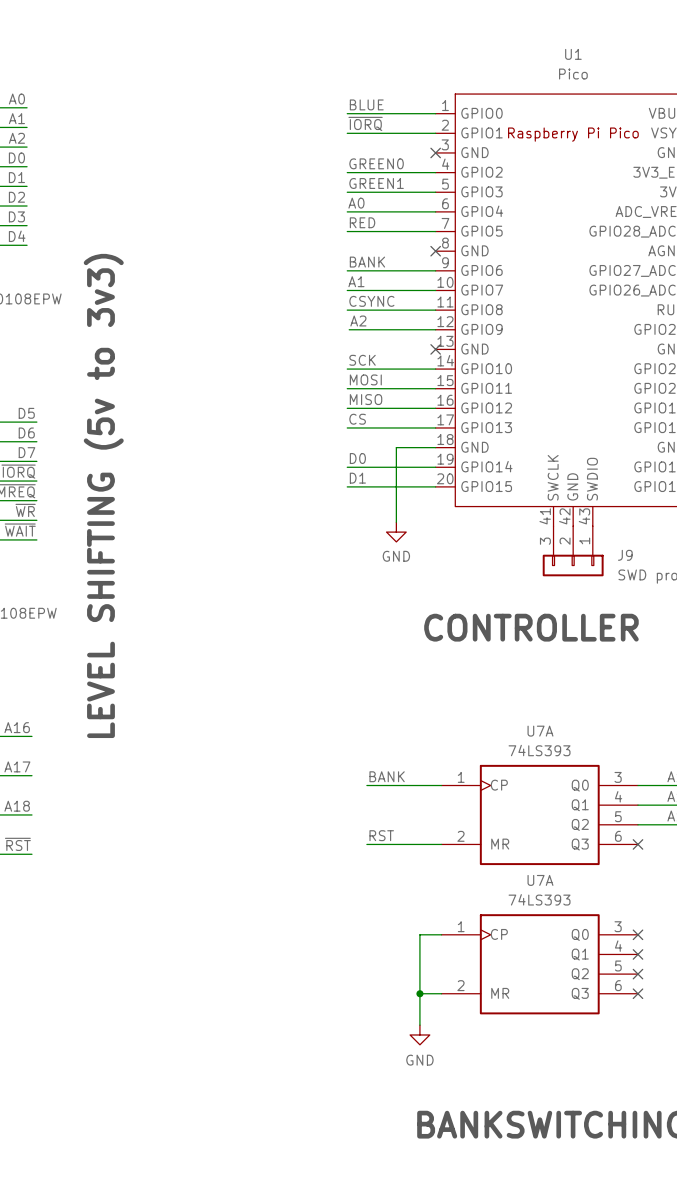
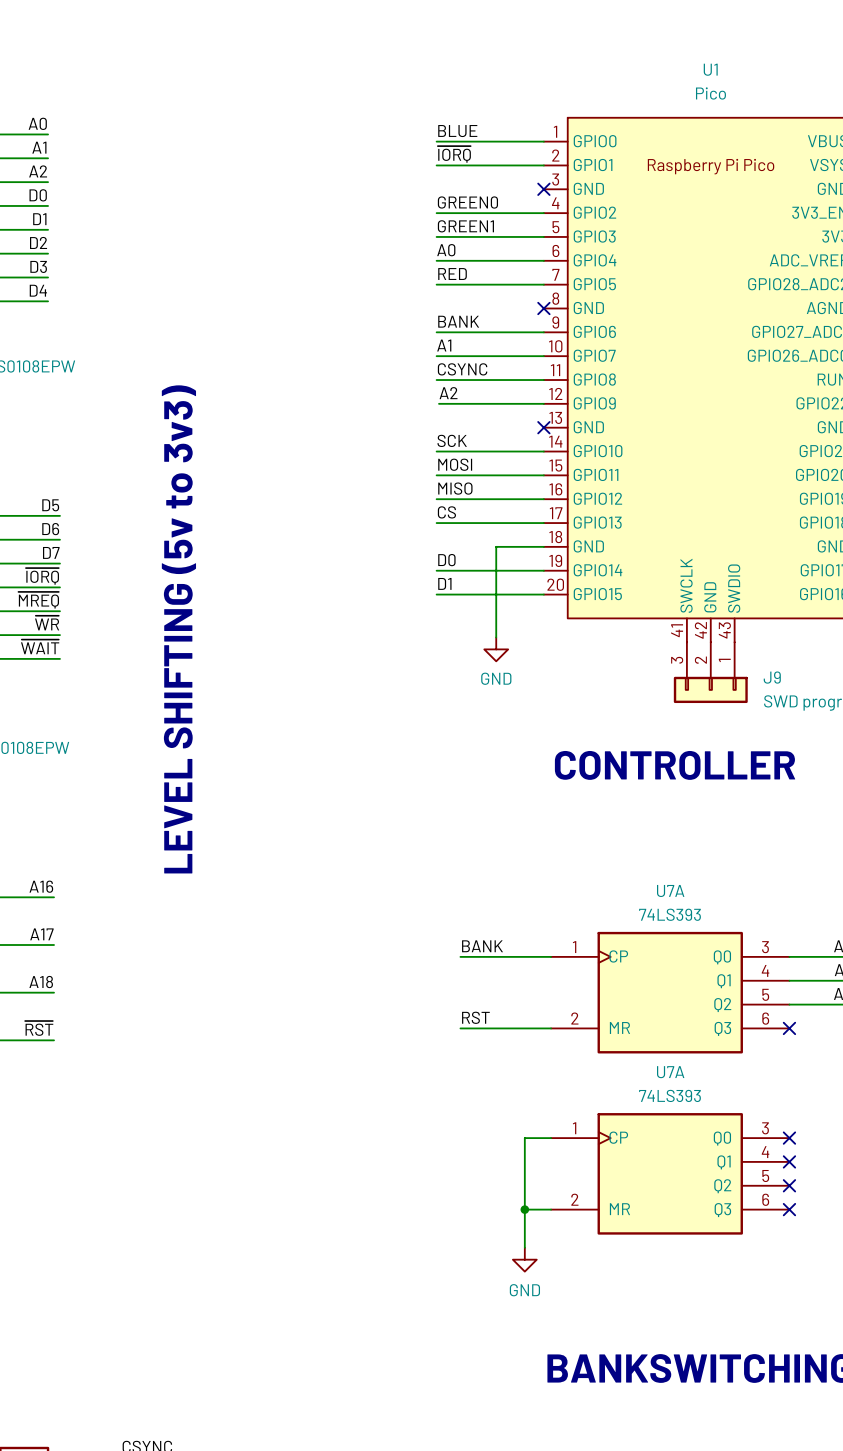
text position: LEVEL SHIFTING (5v to 3v3) (103, 495) -> LEVEL SHIFTING (5v to 3v3) (178, 629)

